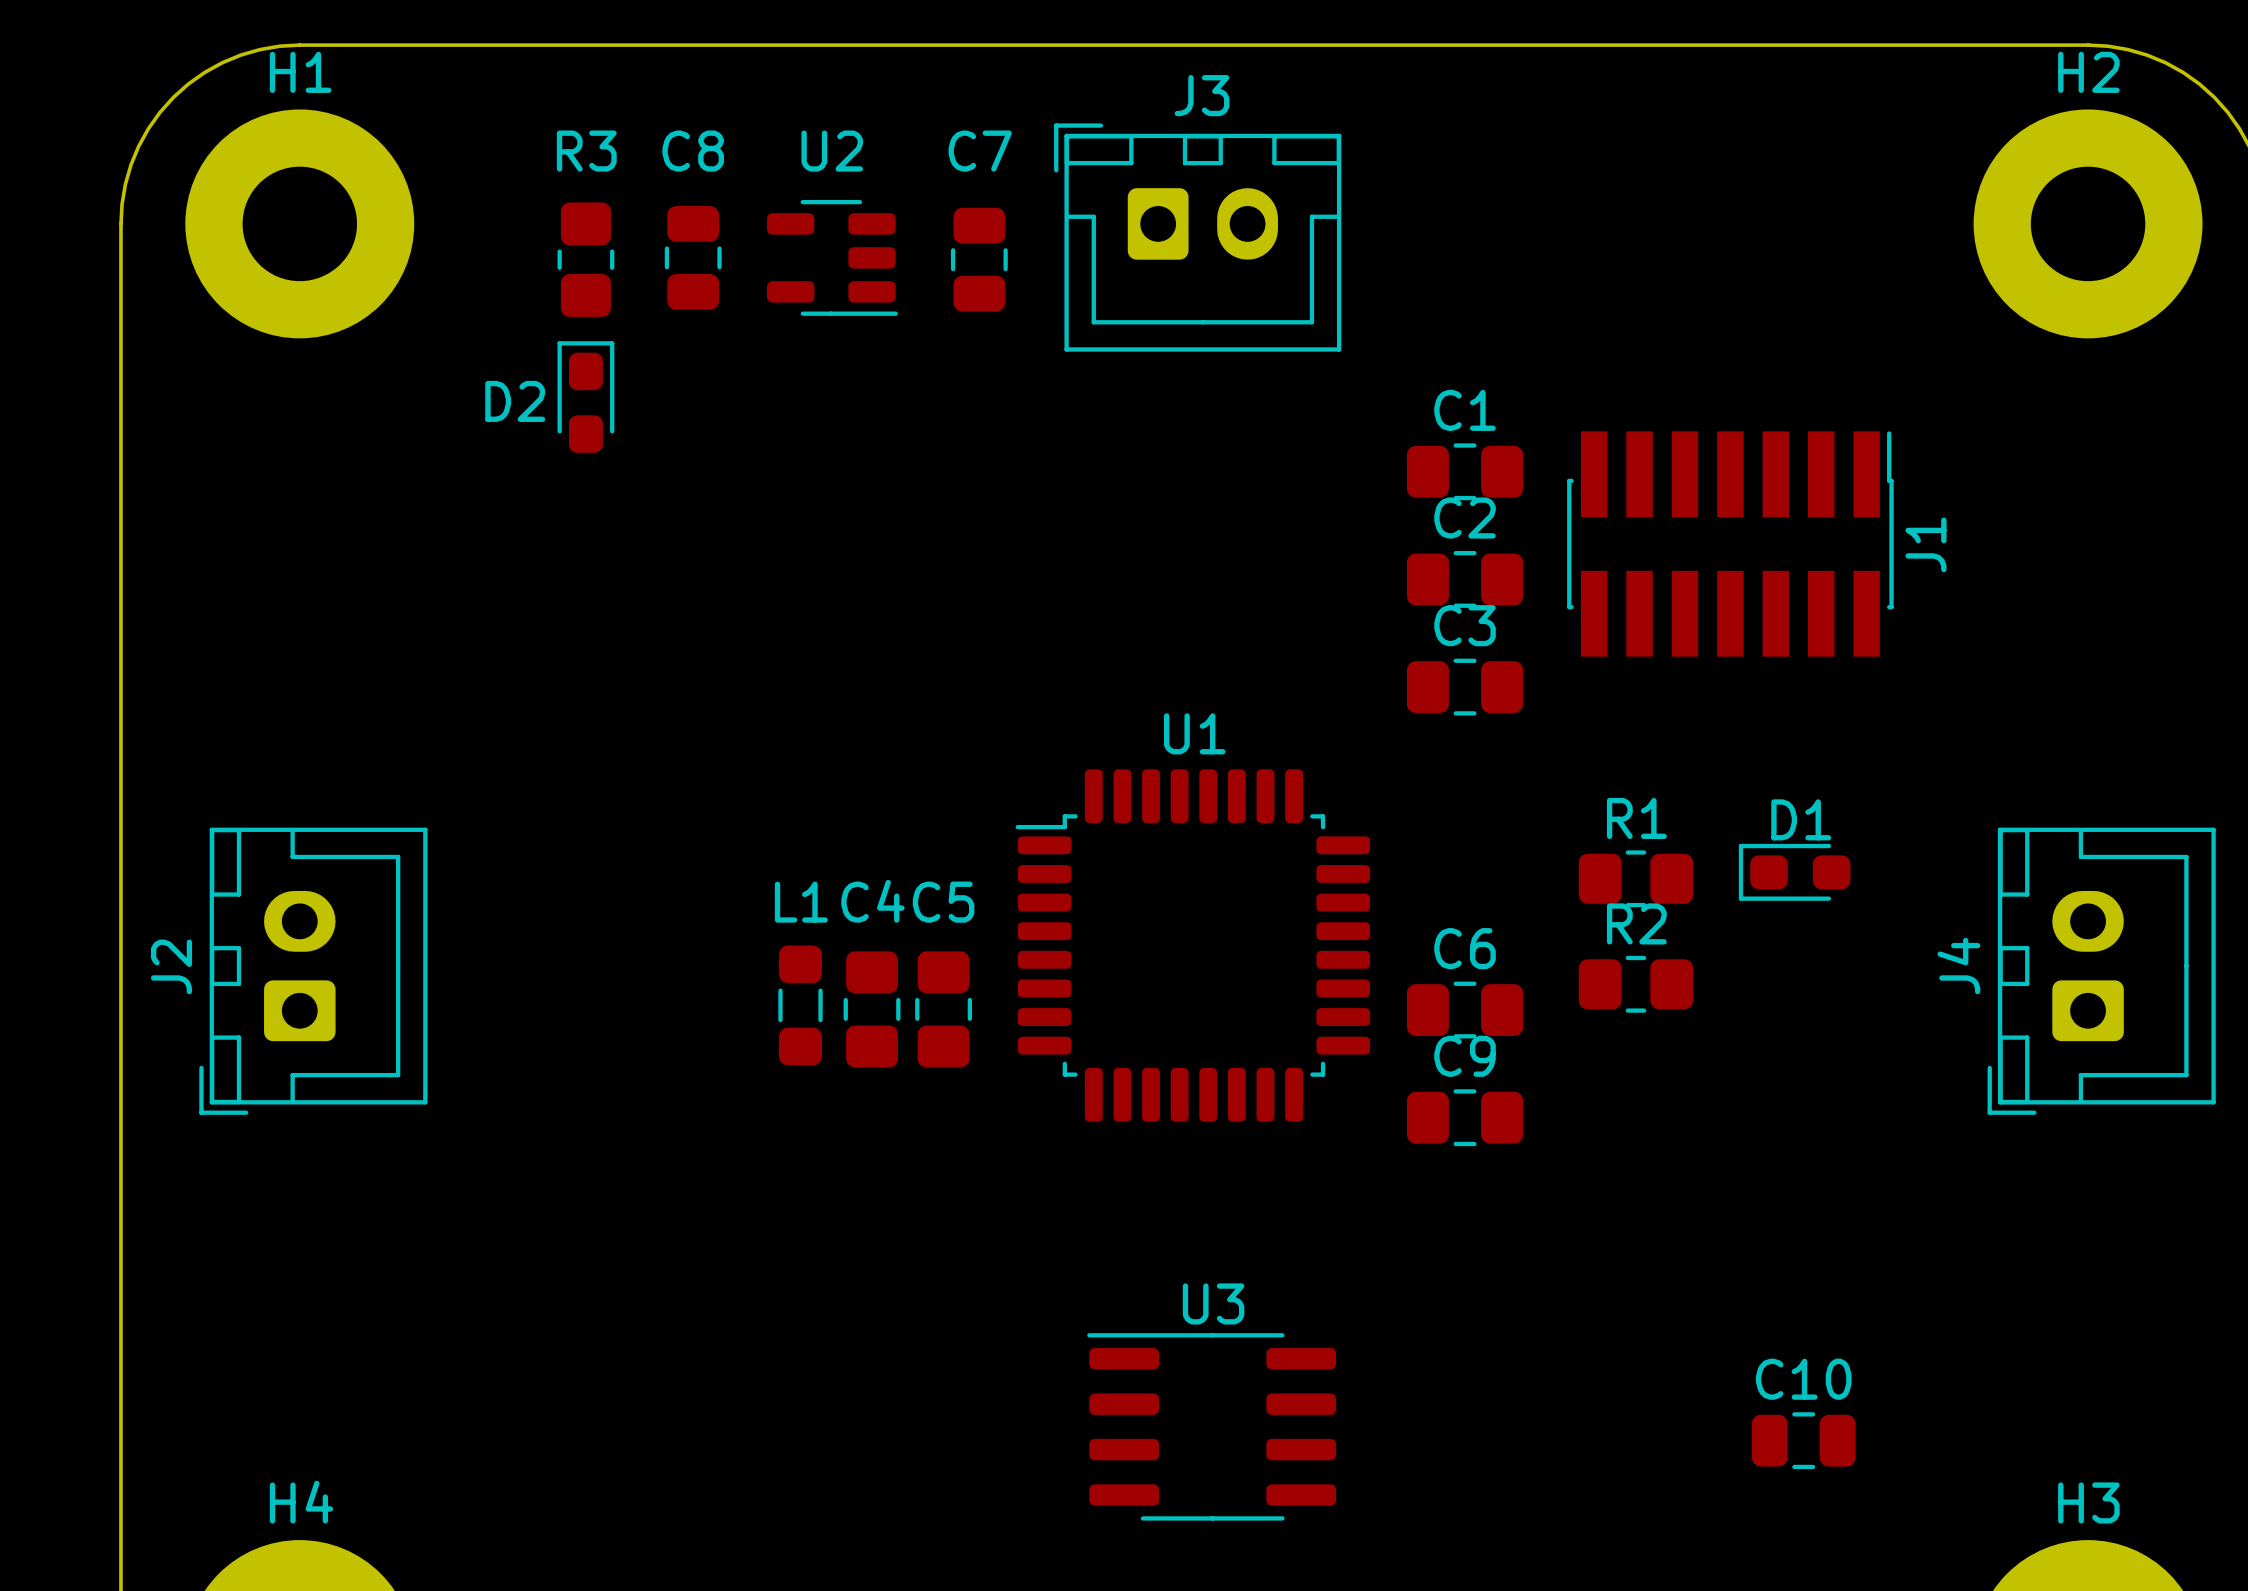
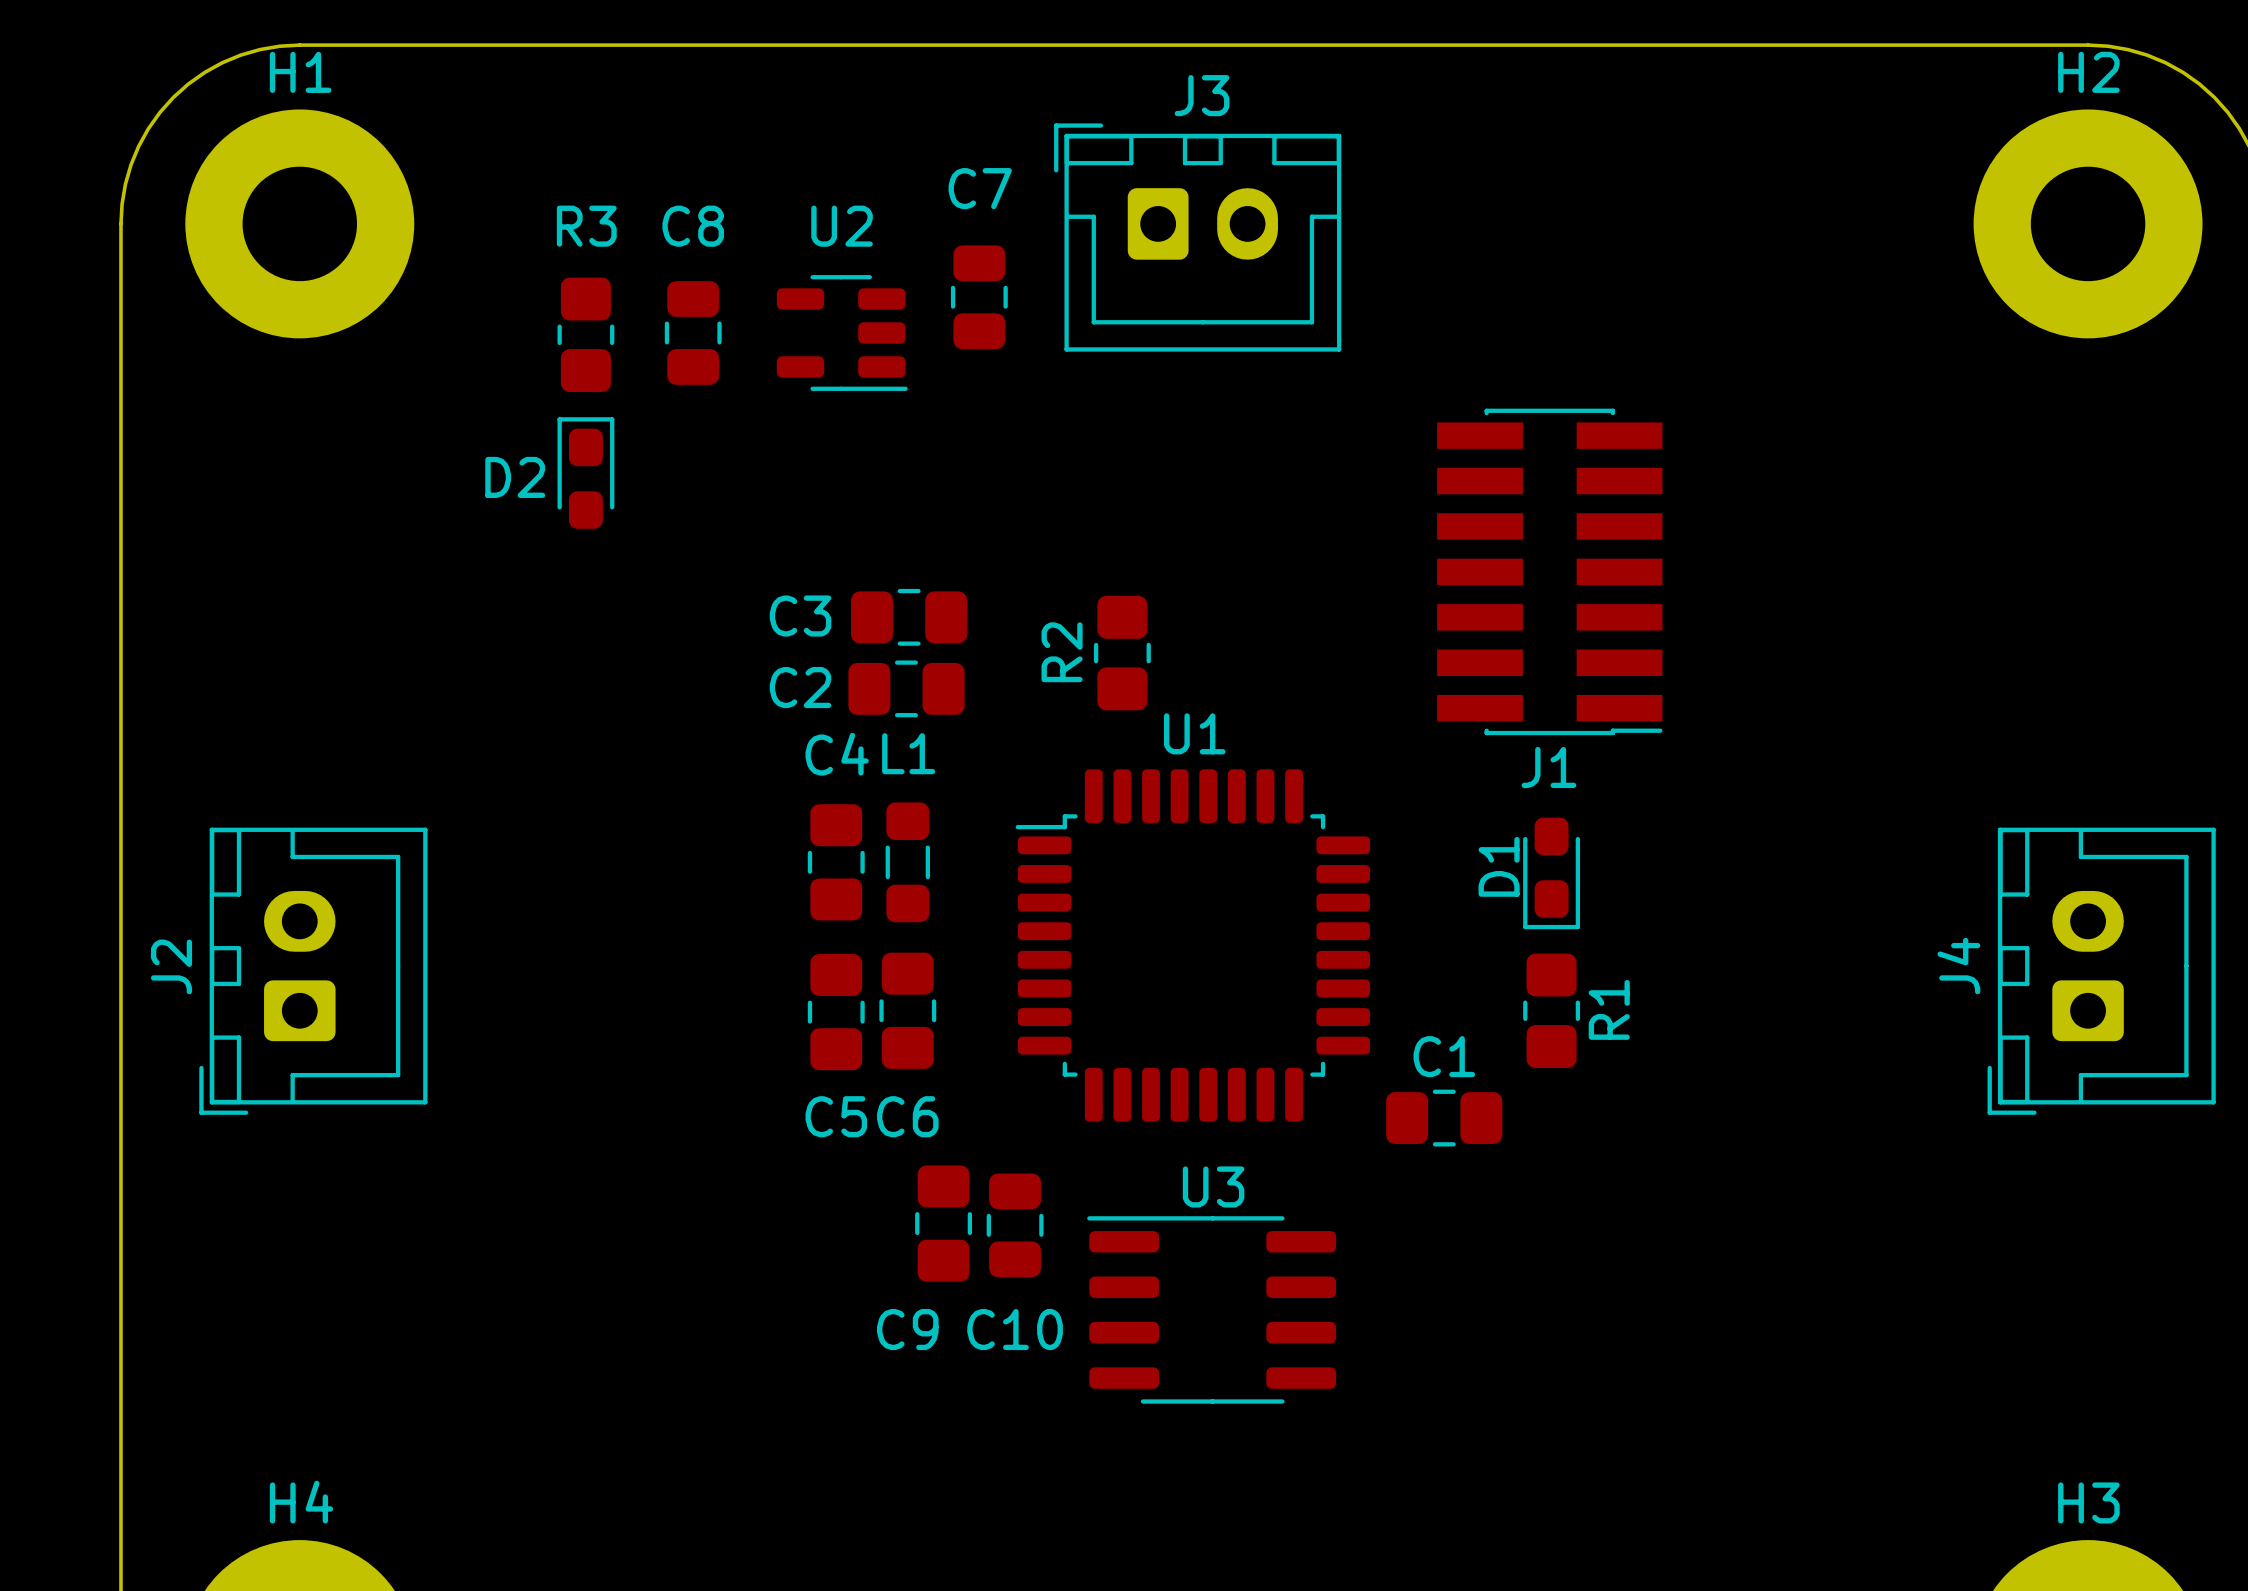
C8 position: (693, 257) -> (693, 333)
U2 position: (832, 257) -> (842, 333)
R3 position: (585, 259) -> (585, 334)
C7 position: (979, 259) -> (979, 297)
D2 position: (585, 397) -> (585, 473)
C1 position: (1465, 471) -> (1444, 1118)
C2 name position: C2 (1465, 518) -> C2 (800, 687)
J1 rotation: 0° (1730, 544) -> 90° clockwise (1549, 571)
C2 position: (1465, 579) -> (906, 688)
C3 name position: C3 (1465, 625) -> C3 (800, 616)
C3 position: (1465, 687) -> (909, 617)
D1 rotation: 0° (1794, 872) -> 90° counterclockwise (1551, 873)
D1 position: (1794, 872) -> (1551, 873)
R1 rotation: 0° (1635, 878) -> 90° clockwise (1551, 1010)
R1 position: (1635, 878) -> (1551, 1010)
L1 name position: L1 (801, 902) -> L1 (908, 753)
C5 name position: C5 (943, 902) -> C5 (836, 1116)
R2 name position: R2 (1636, 923) -> R2 (1062, 652)
C6 name position: C6 (1465, 948) -> C6 (907, 1116)
R2 rotation: 0° (1635, 984) -> 90° clockwise (1122, 653)
R2 position: (1635, 984) -> (1122, 653)
L1 position: (800, 1005) -> (907, 862)
C4 position: (872, 1009) -> (836, 862)
C5 position: (943, 1009) -> (836, 1012)
C6 rotation: 0° (1465, 1010) -> 90° clockwise (907, 1010)
C6 position: (1465, 1010) -> (907, 1010)
C9 name position: C9 (1465, 1056) -> C9 (907, 1329)
C9 rotation: 0° (1465, 1117) -> 90° clockwise (943, 1223)
C9 position: (1465, 1117) -> (943, 1223)
C10 name position: C10 (1803, 1379) -> C10 (1015, 1329)
U3 position: (1211, 1426) -> (1211, 1309)
C10 rotation: 0° (1803, 1440) -> 90° clockwise (1015, 1225)
C10 position: (1803, 1440) -> (1015, 1225)

